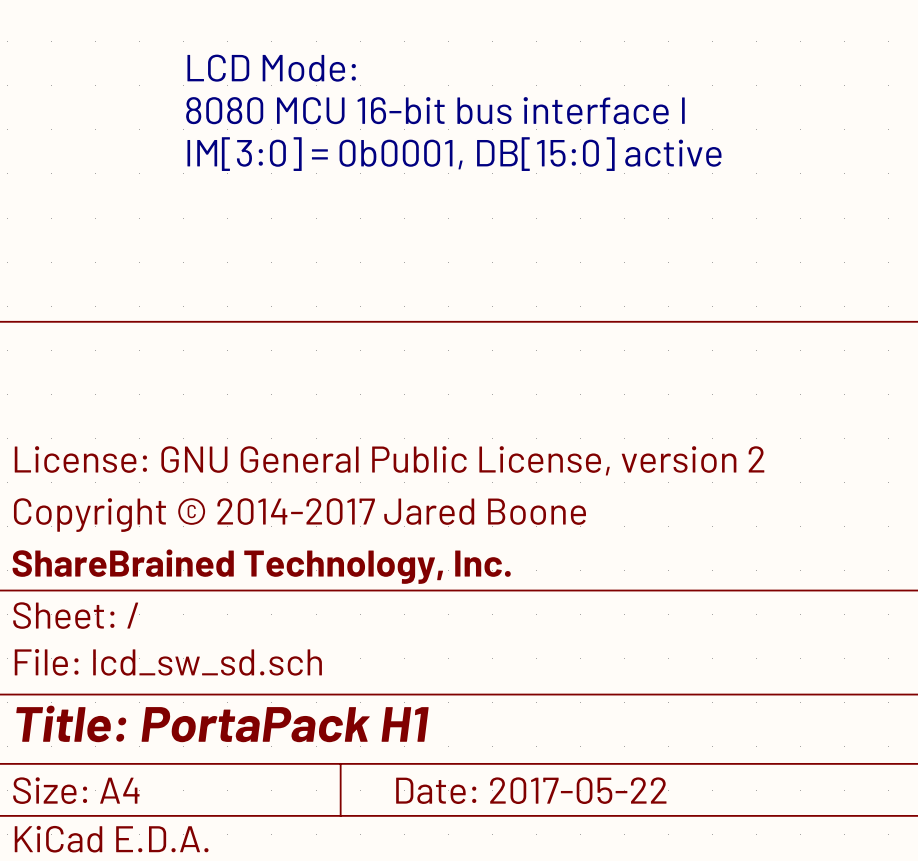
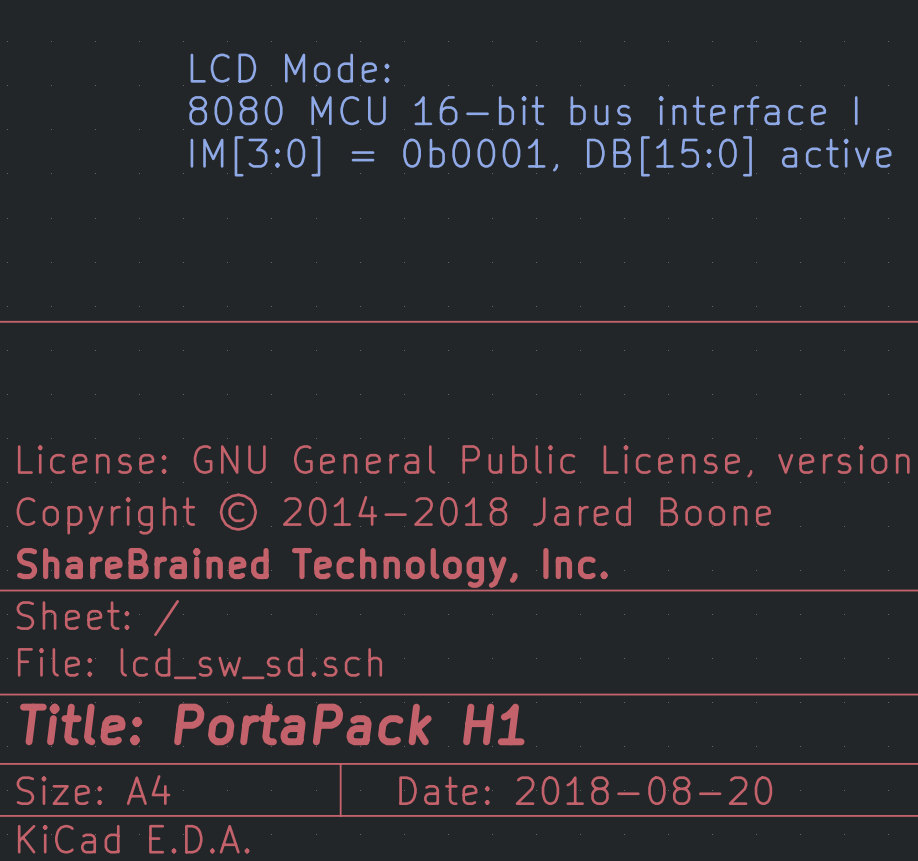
title block: Copyright © 2014-2017 Jared Boone (299, 515) -> Copyright © 2014-2018 Jared Boone (393, 514)
title block: Date: 2017-05-22 (531, 790) -> Date: 2018-08-20 (585, 790)

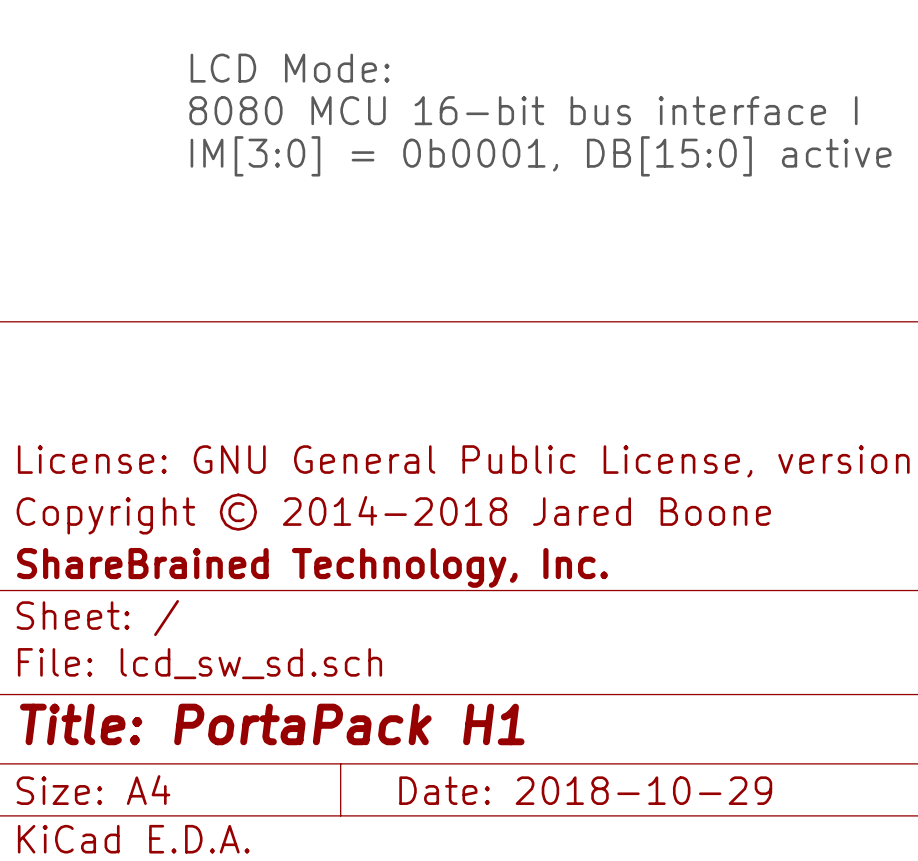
title block: Date: 2018-08-20 (585, 790) -> Date: 2018-10-29 (585, 790)

